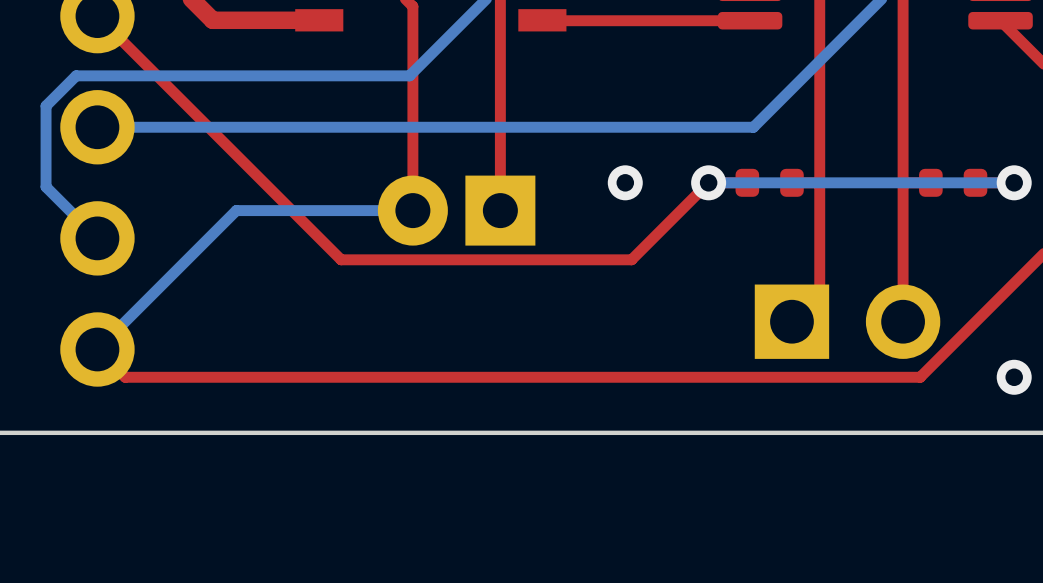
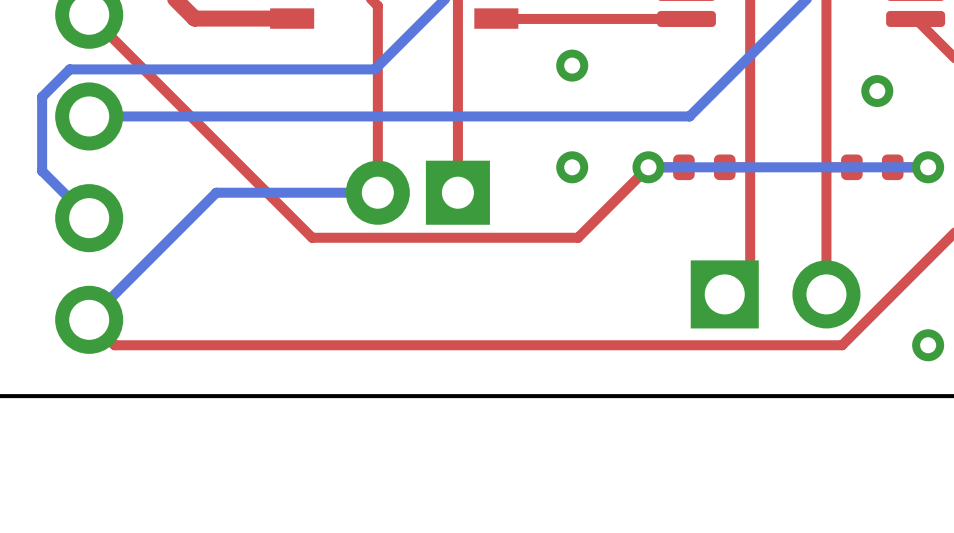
via: none -> (572, 65)
via: none -> (877, 91)

